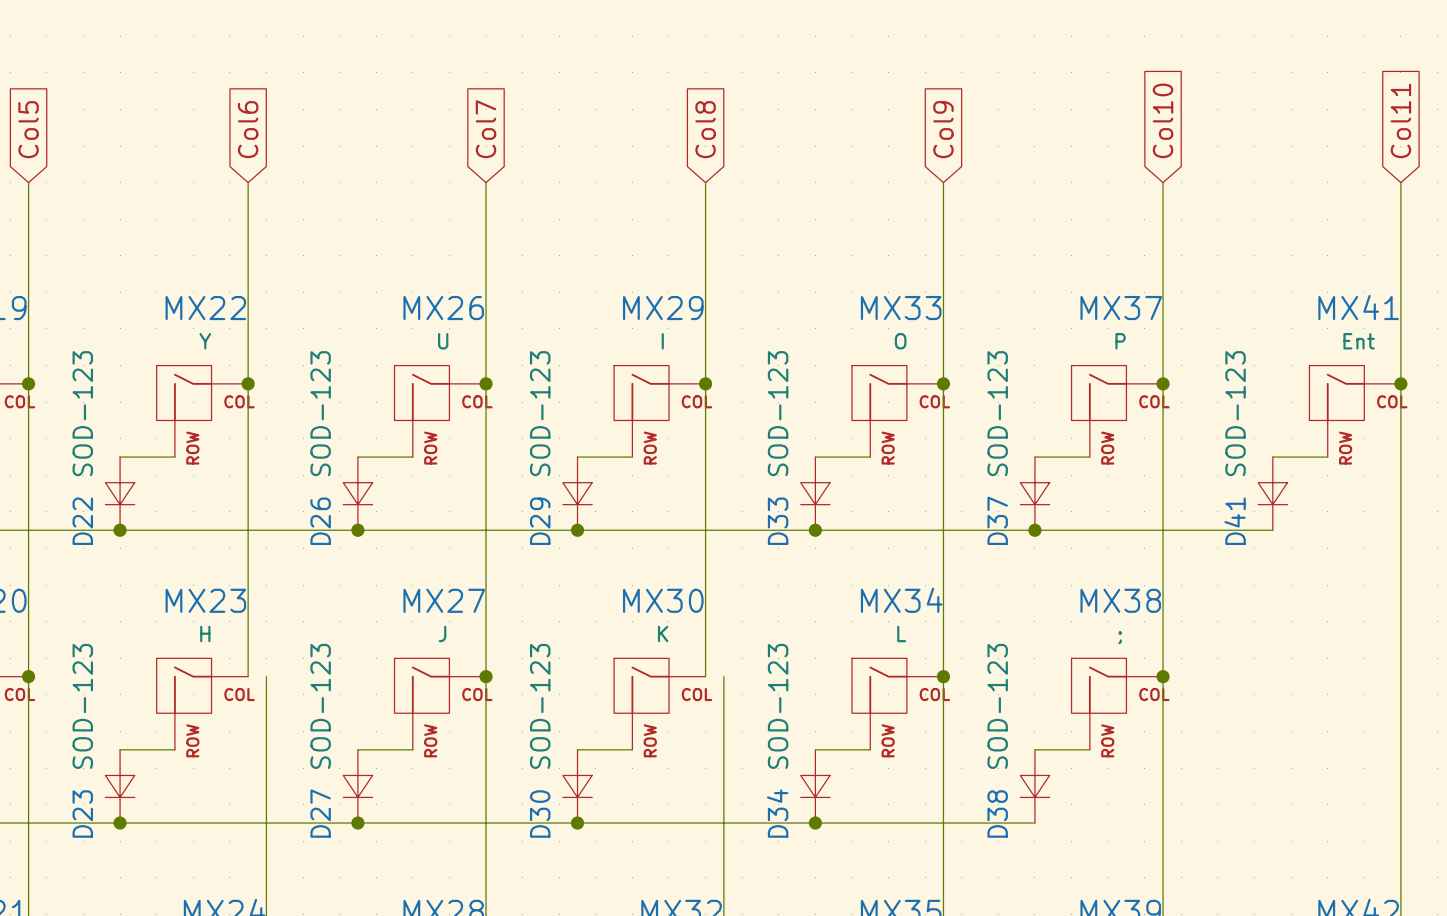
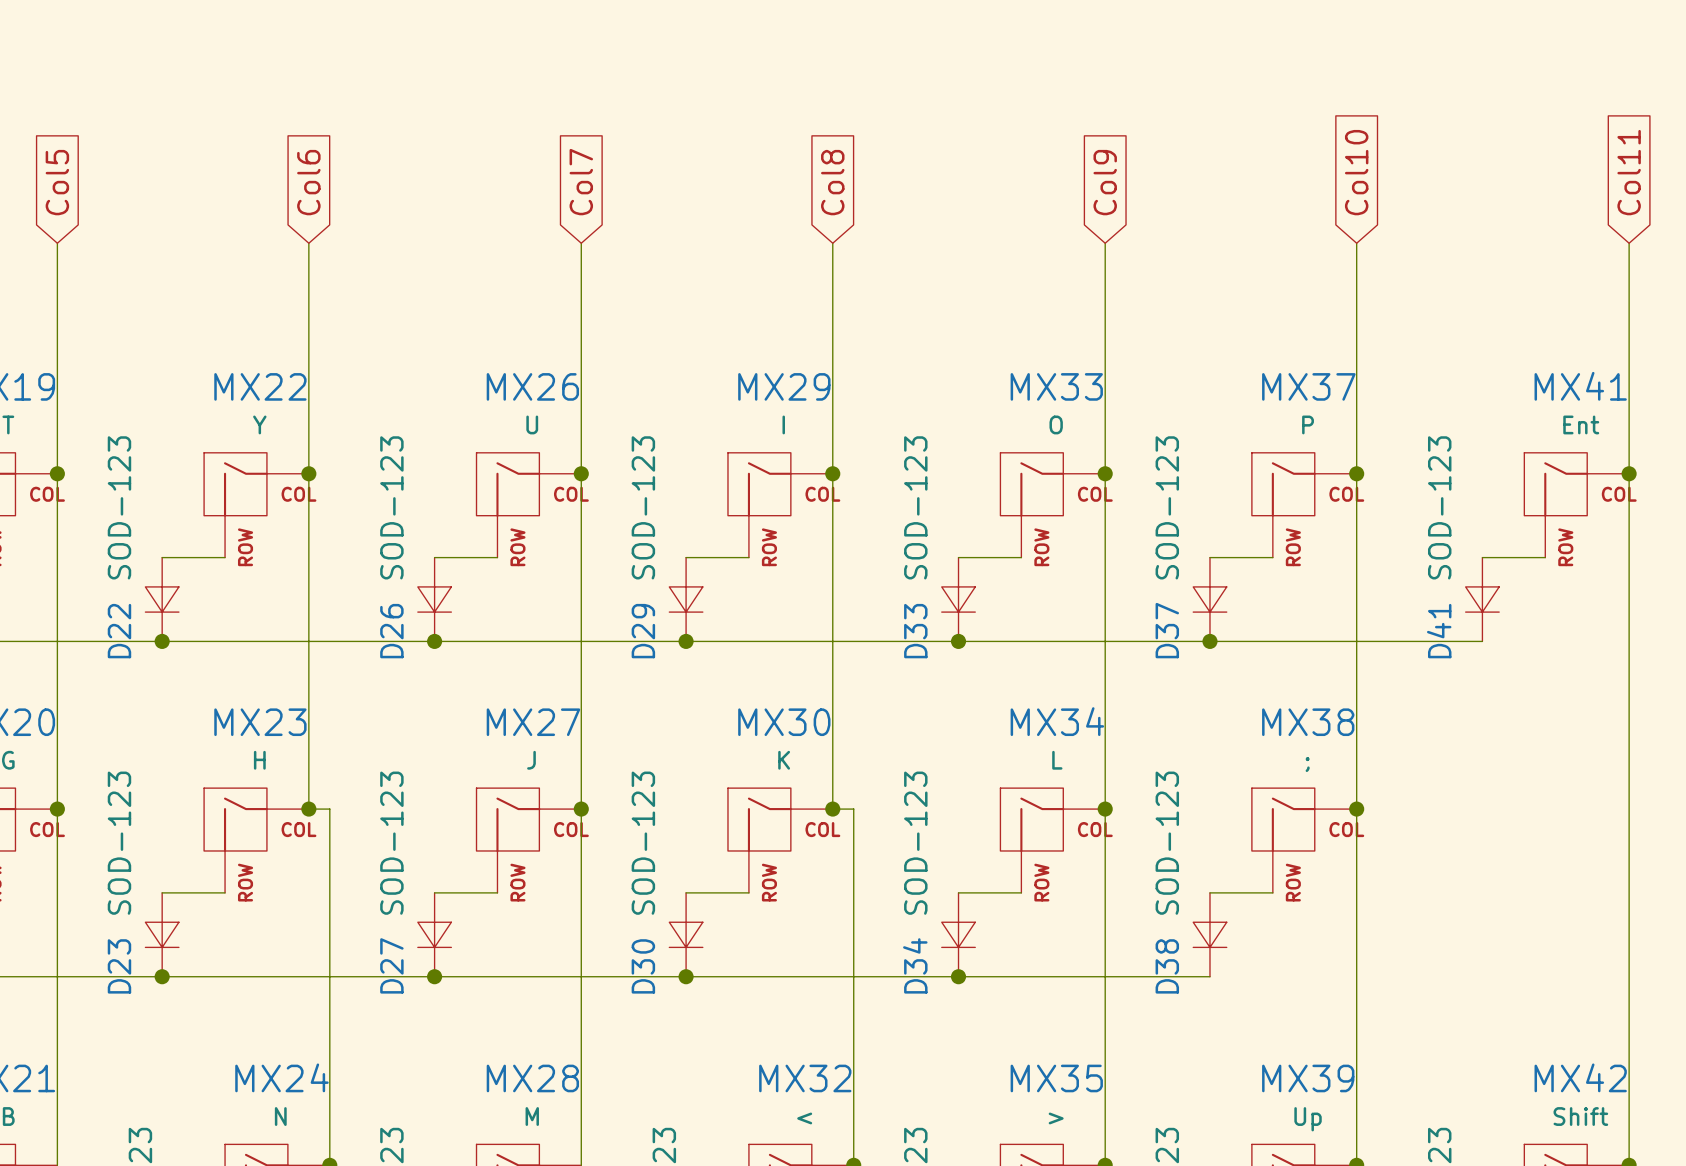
wire: none -> (308, 809) (329, 809)
junction: none -> (308, 809)
wire: none -> (832, 809) (853, 809)
junction: none -> (832, 809)

